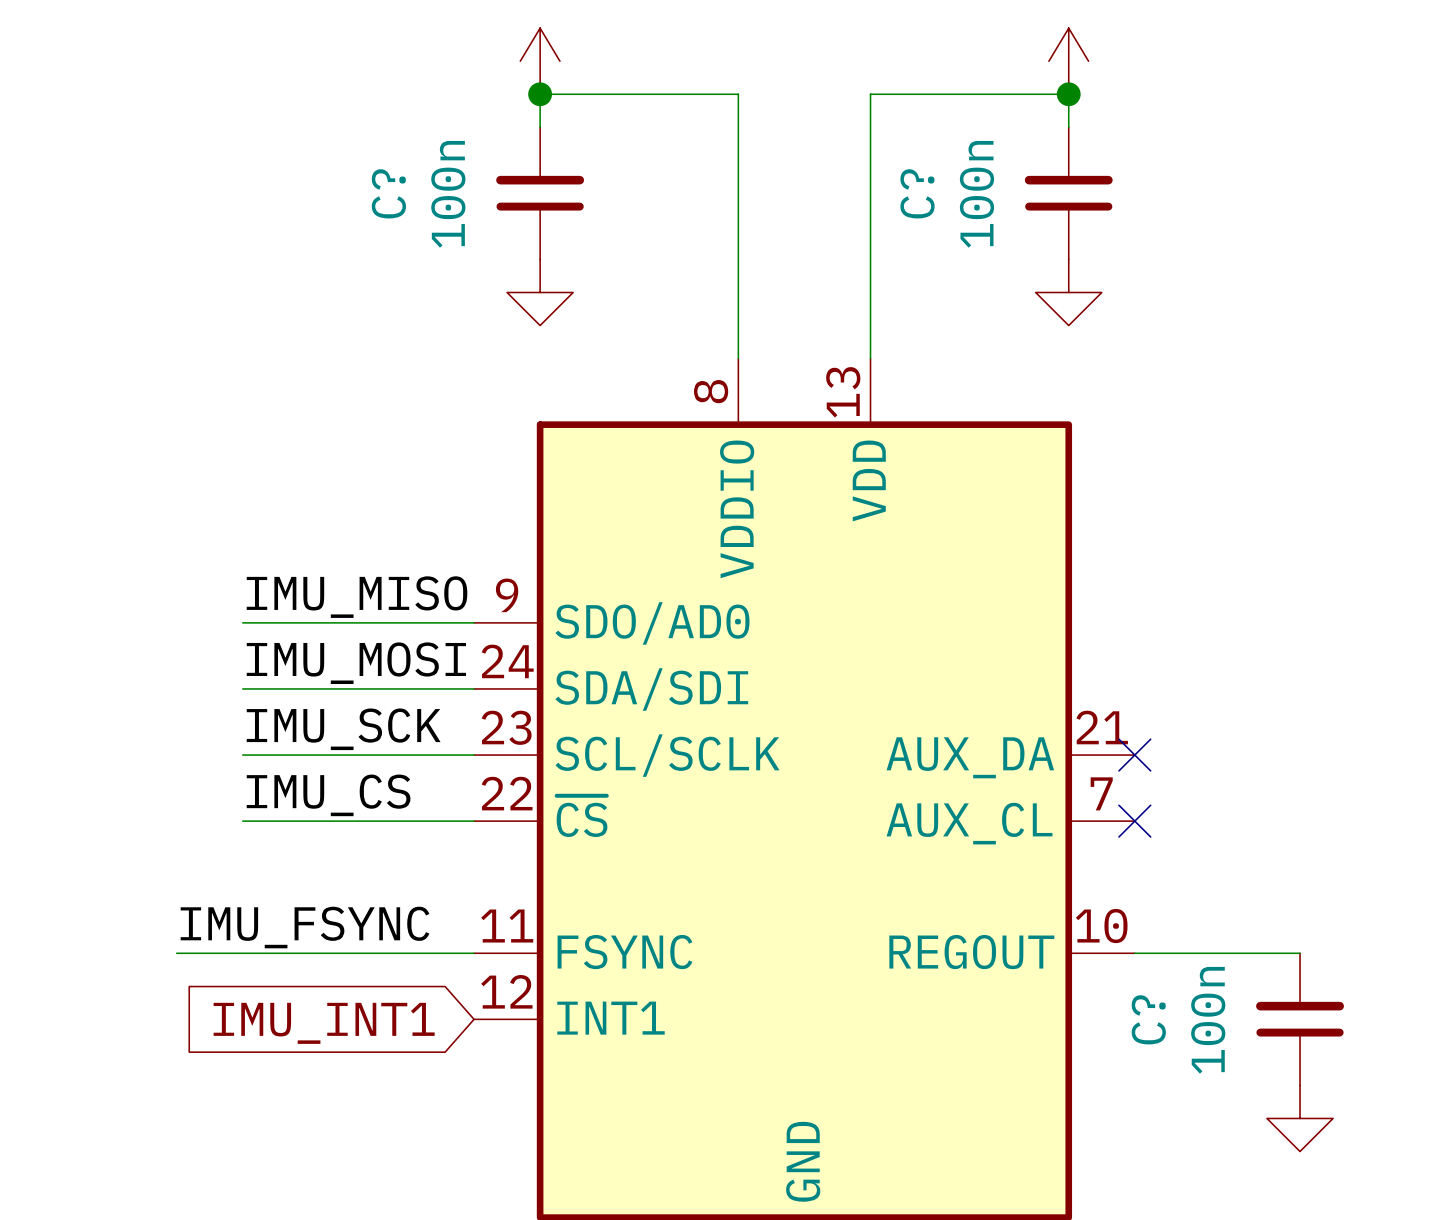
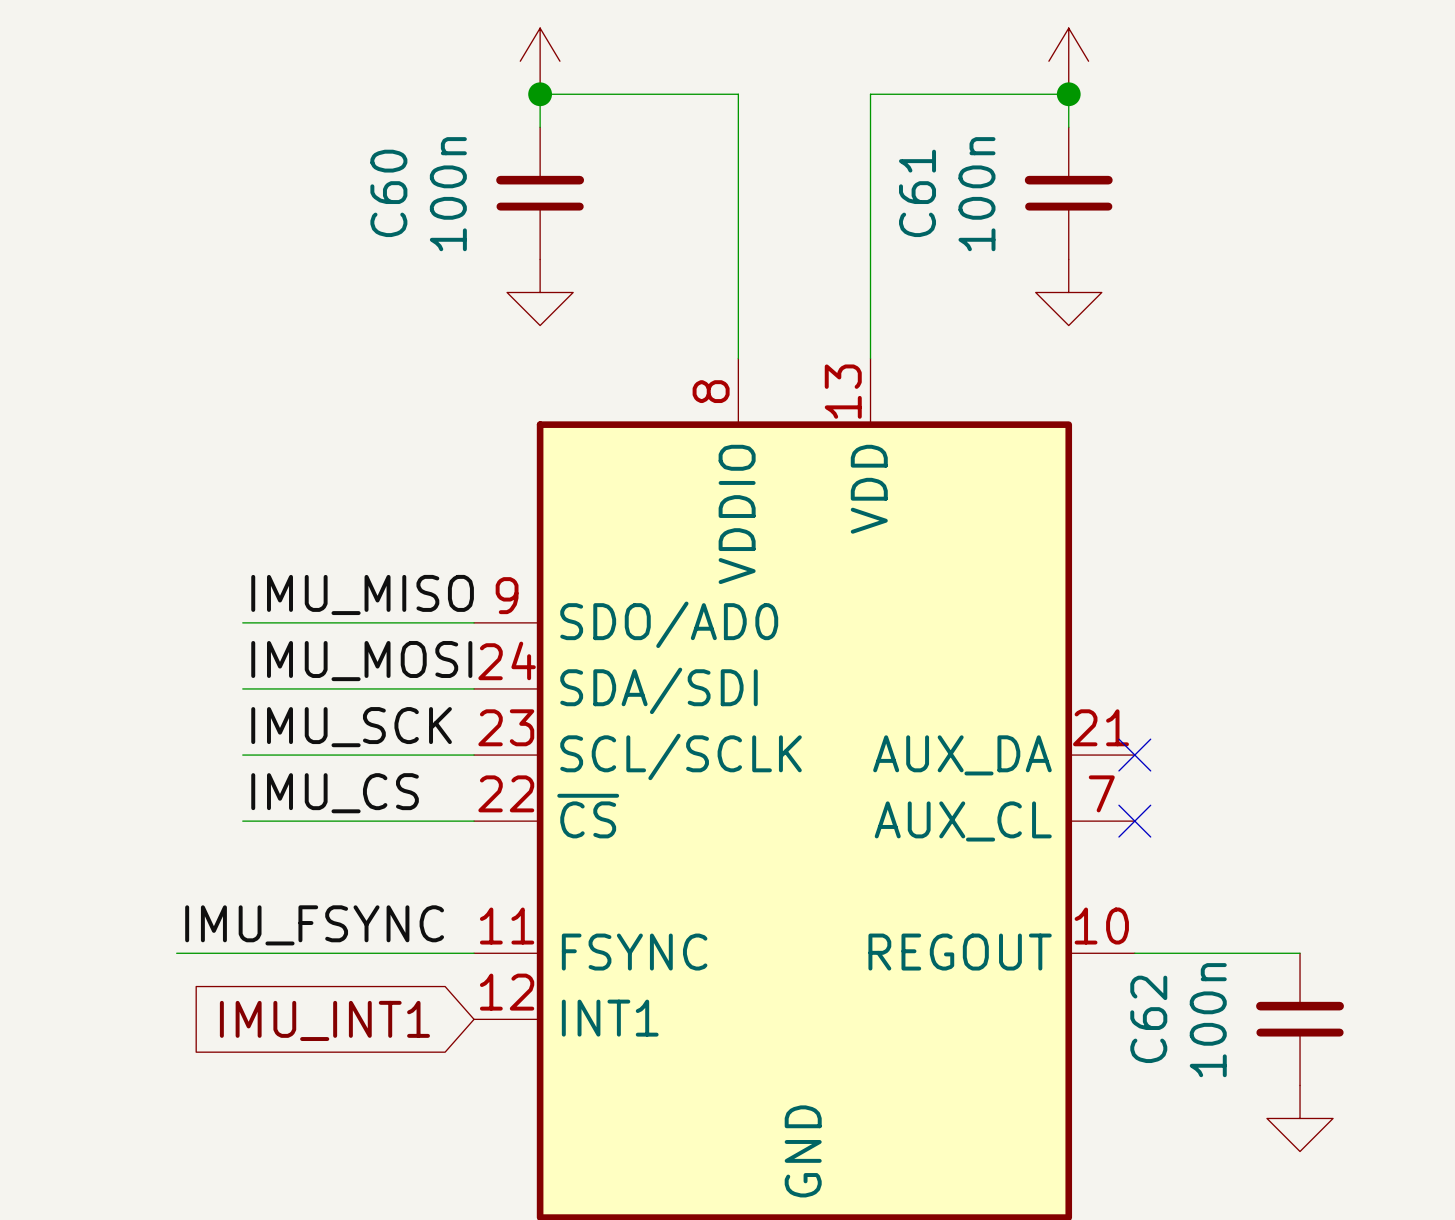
C? name: C? (388, 193) -> C60 (388, 193)
C? name: C? (917, 193) -> C61 (917, 193)
C? name: C? (1148, 1019) -> C62 (1148, 1019)

